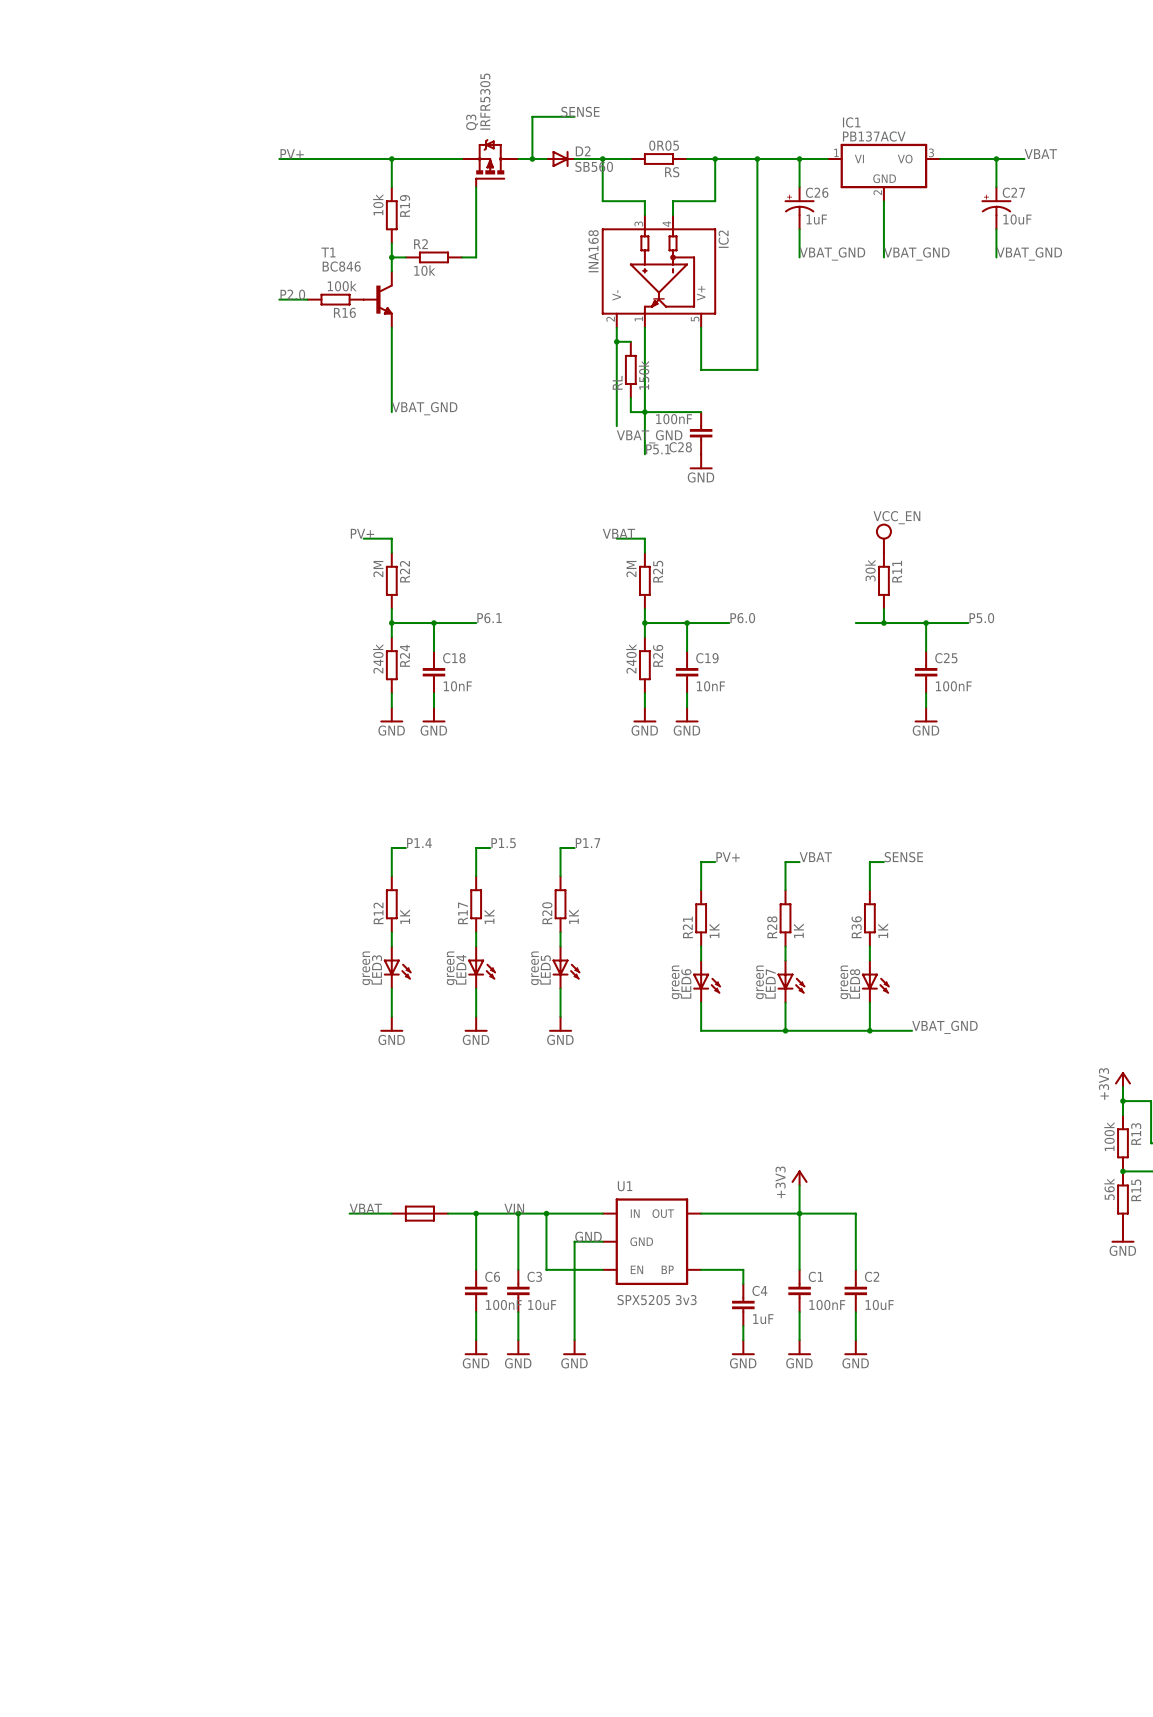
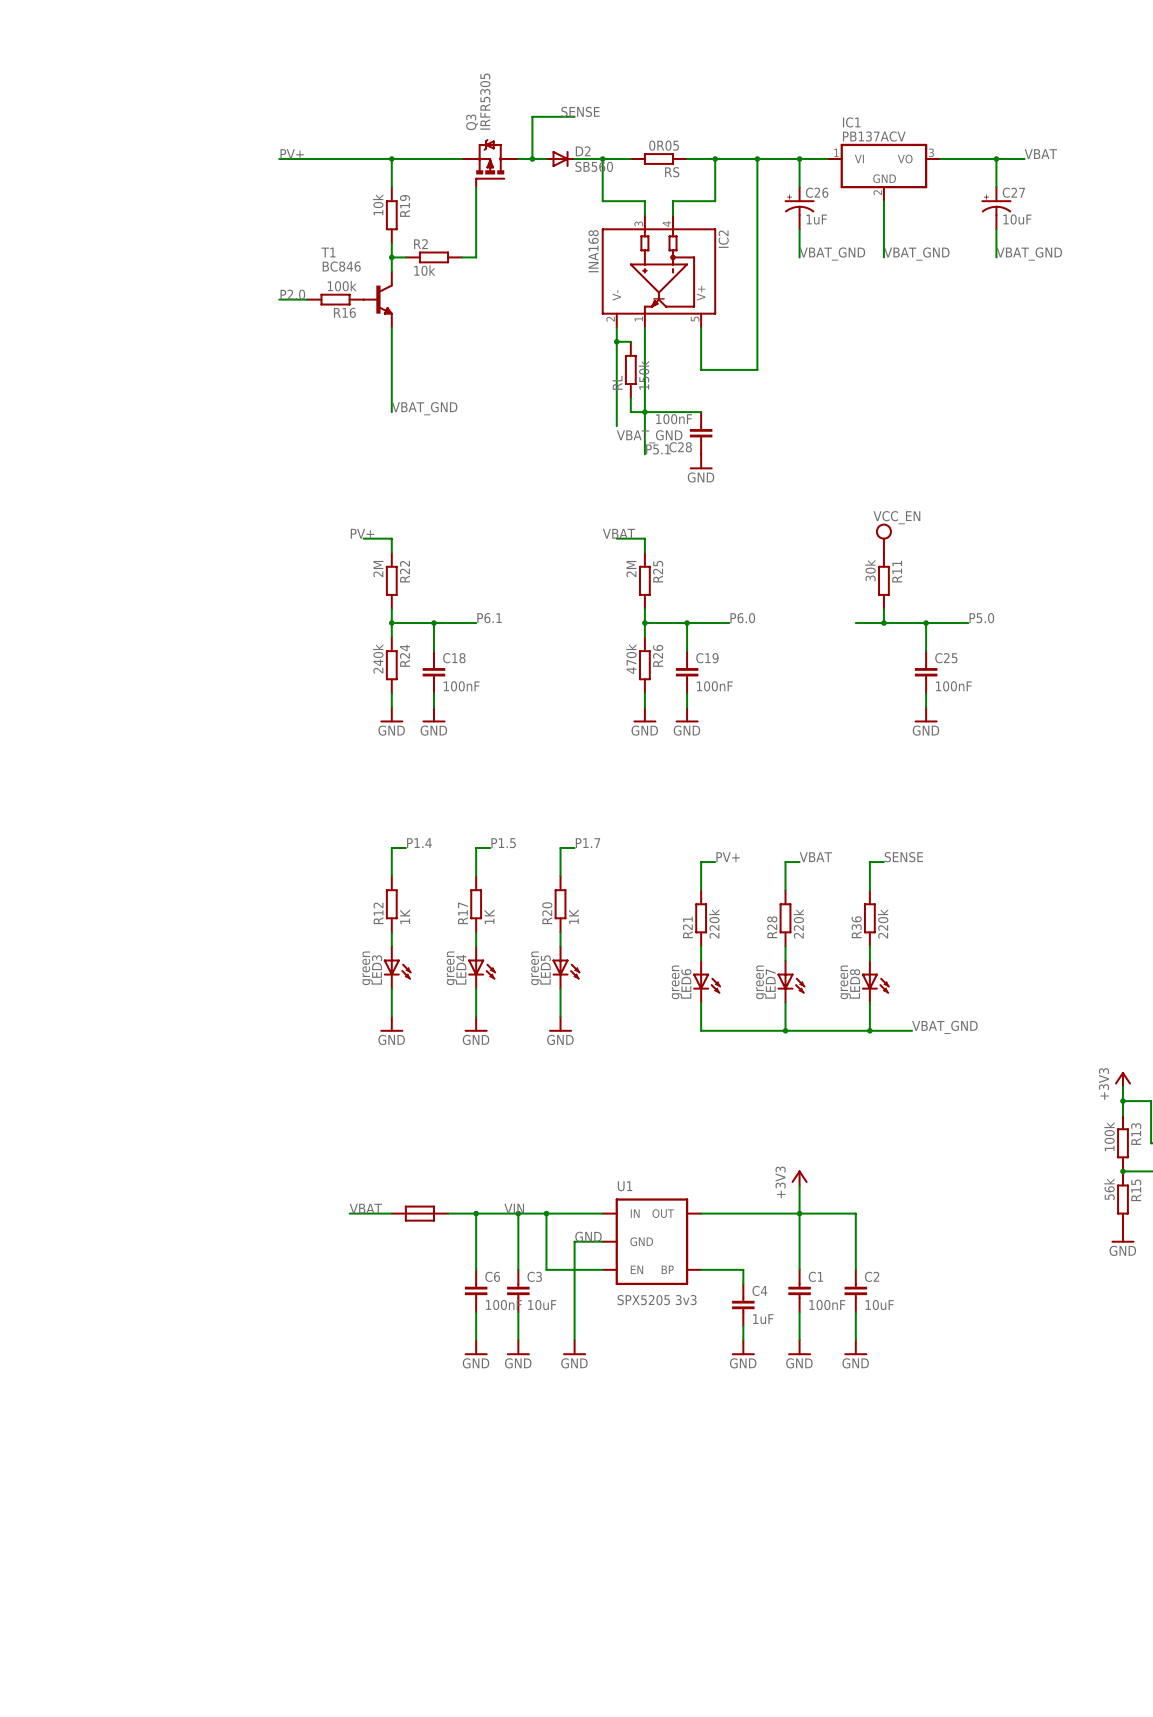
R26 value: 240k (631, 658) -> 470k (631, 658)
C18 value: 10nF (457, 686) -> 100nF (461, 686)
C19 value: 10nF (710, 686) -> 100nF (714, 686)
R21 value: 1K (714, 930) -> 220k (714, 923)
R28 value: 1K (798, 930) -> 220k (798, 923)
R36 value: 1K (883, 930) -> 220k (883, 923)

